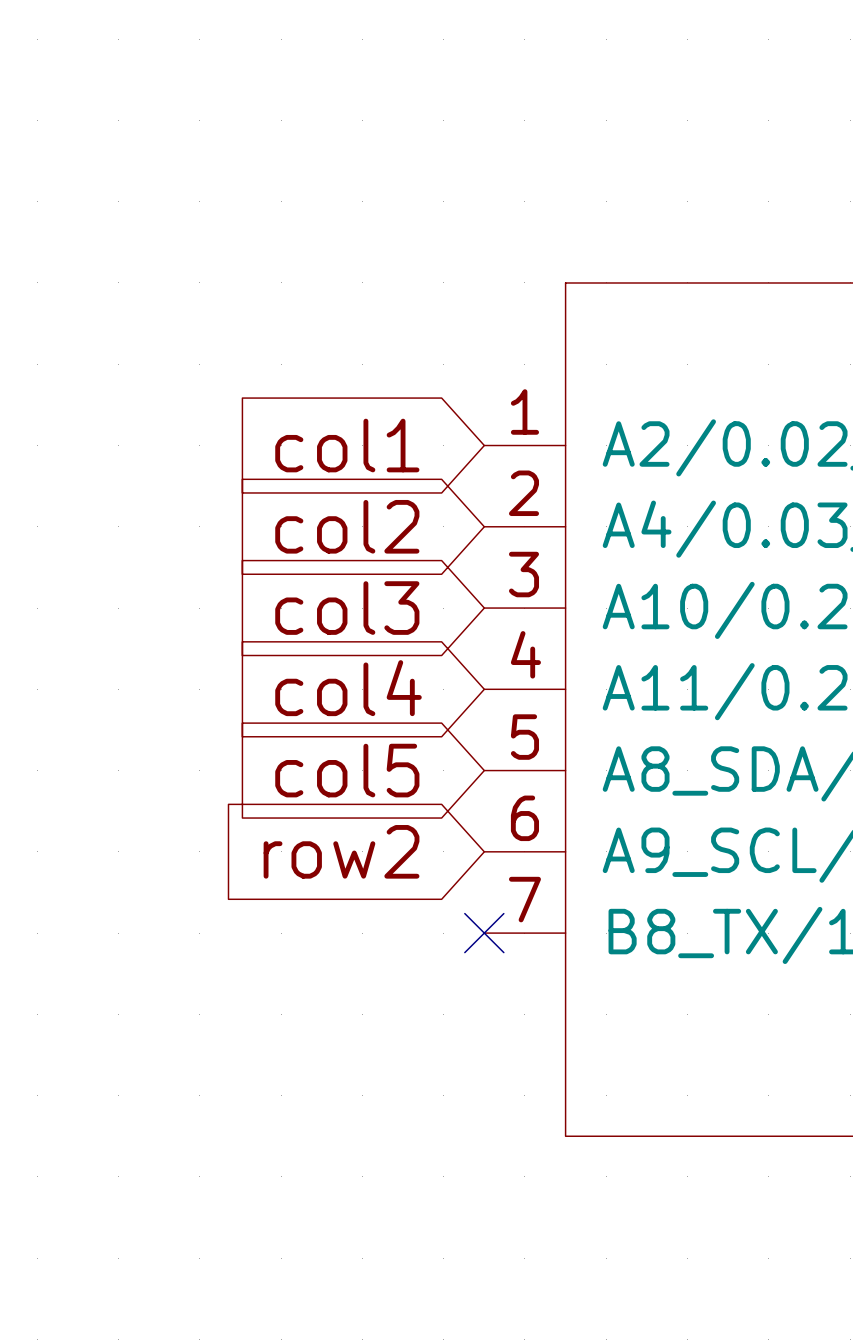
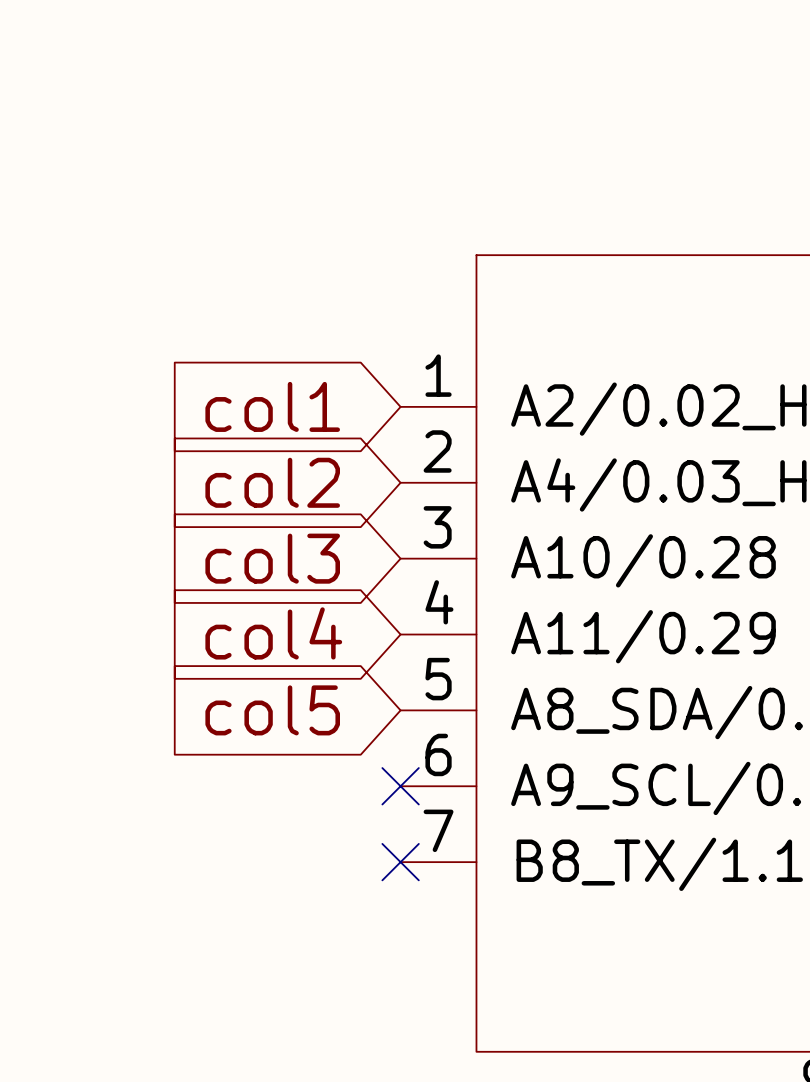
global label: row2 (341, 851) -> none
no-connect mark: none -> (400, 786)

